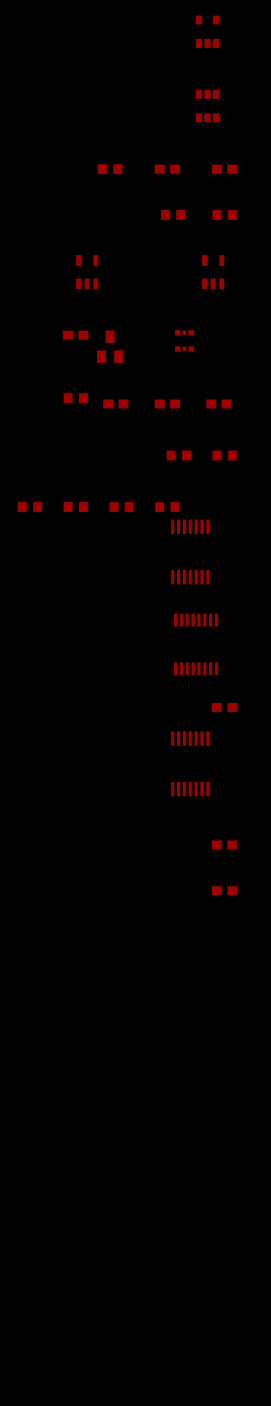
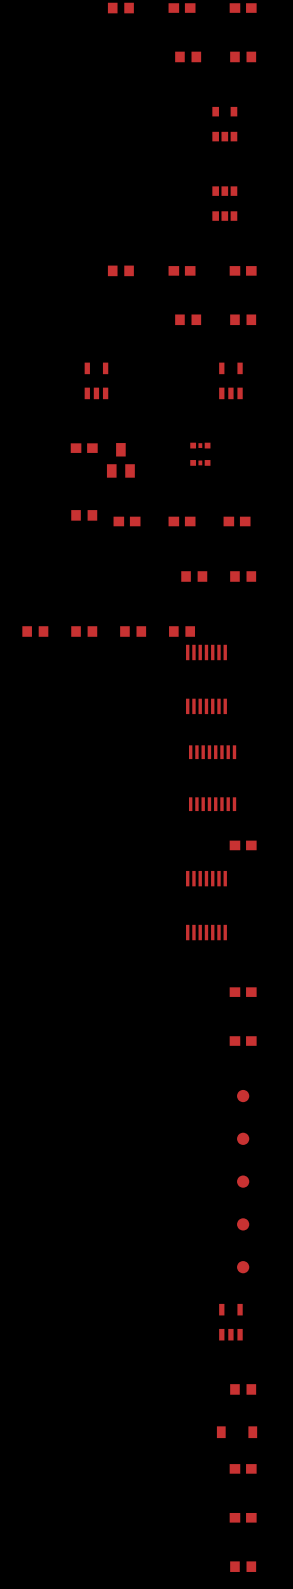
part: none -> (243, 1096)
part: none -> (243, 1138)
part: none -> (243, 1181)
part: none -> (243, 1224)
part: none -> (243, 1267)
part: none -> (230, 1322)
part: none -> (243, 1389)
part: none -> (237, 1432)
part: none -> (243, 1468)
part: none -> (243, 1517)
part: none -> (243, 1566)

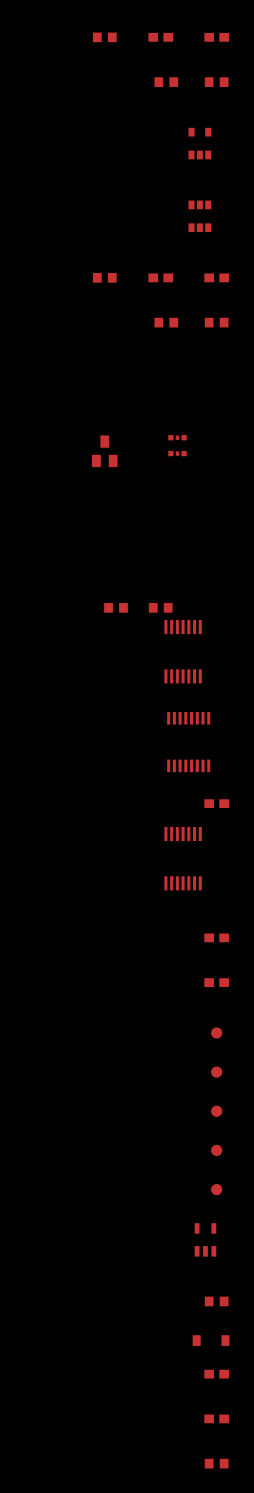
part: (96, 380) -> none
part: (230, 380) -> none
part: (84, 448) -> none
part: (84, 515) -> none
part: (127, 521) -> none
part: (182, 521) -> none
part: (237, 521) -> none
part: (194, 576) -> none
part: (243, 576) -> none
part: (35, 631) -> none
part: (84, 631) -> none

